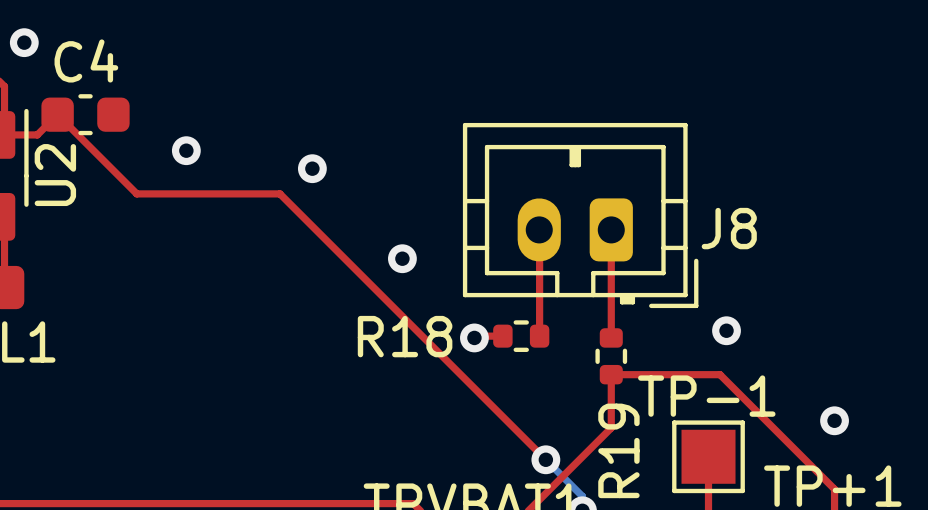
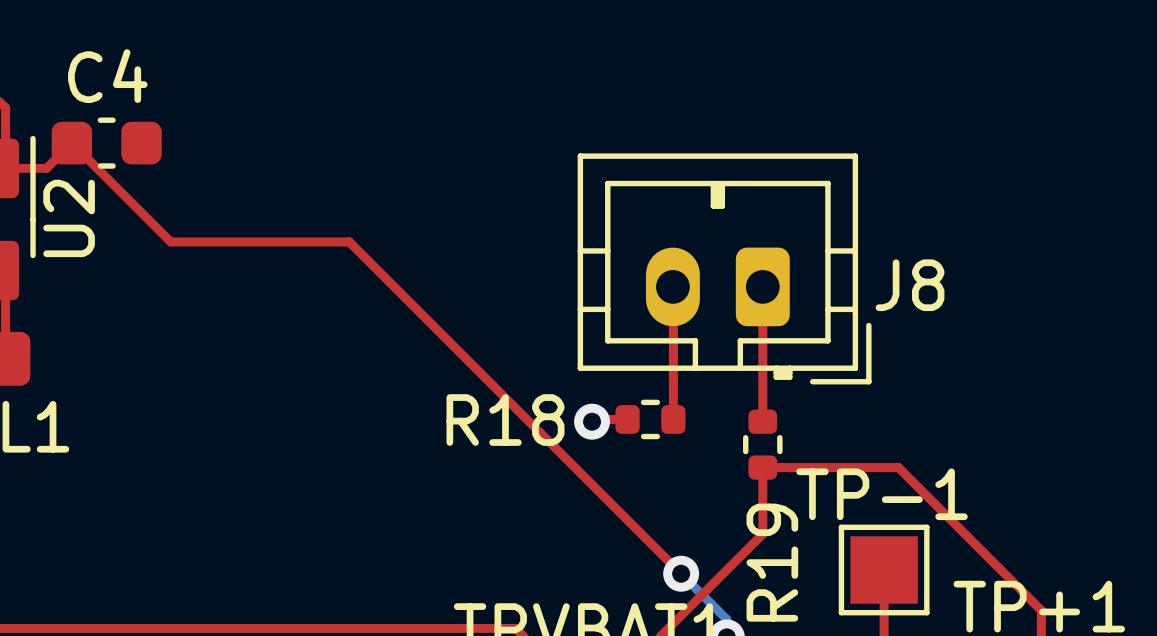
via: (24, 42) -> none
via: (186, 150) -> none
via: (312, 168) -> none
via: (402, 258) -> none
via: (726, 330) -> none
via: (834, 420) -> none

